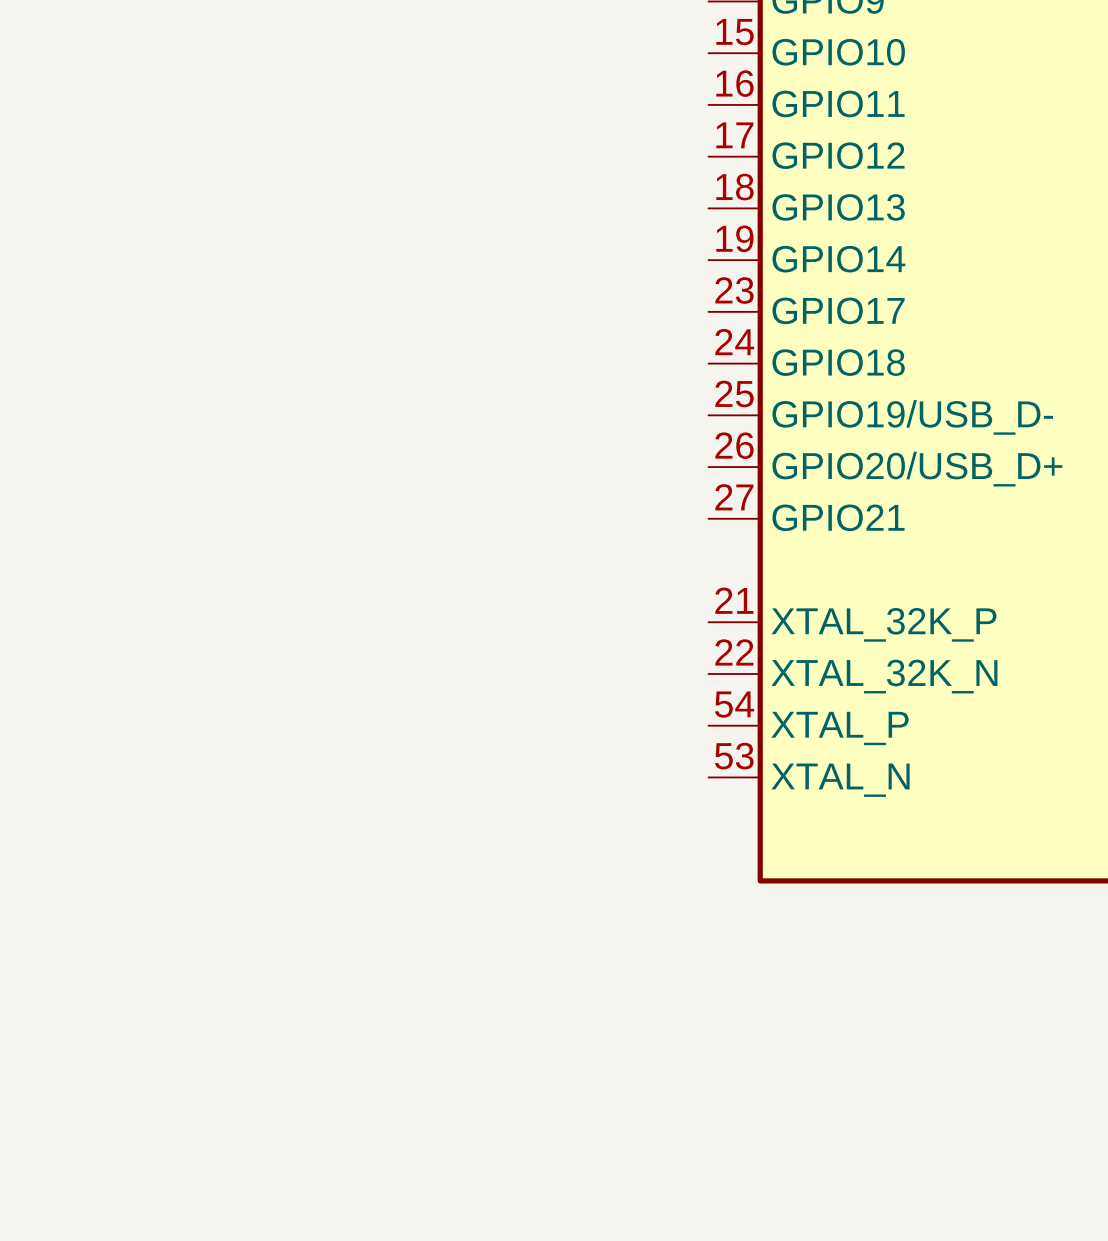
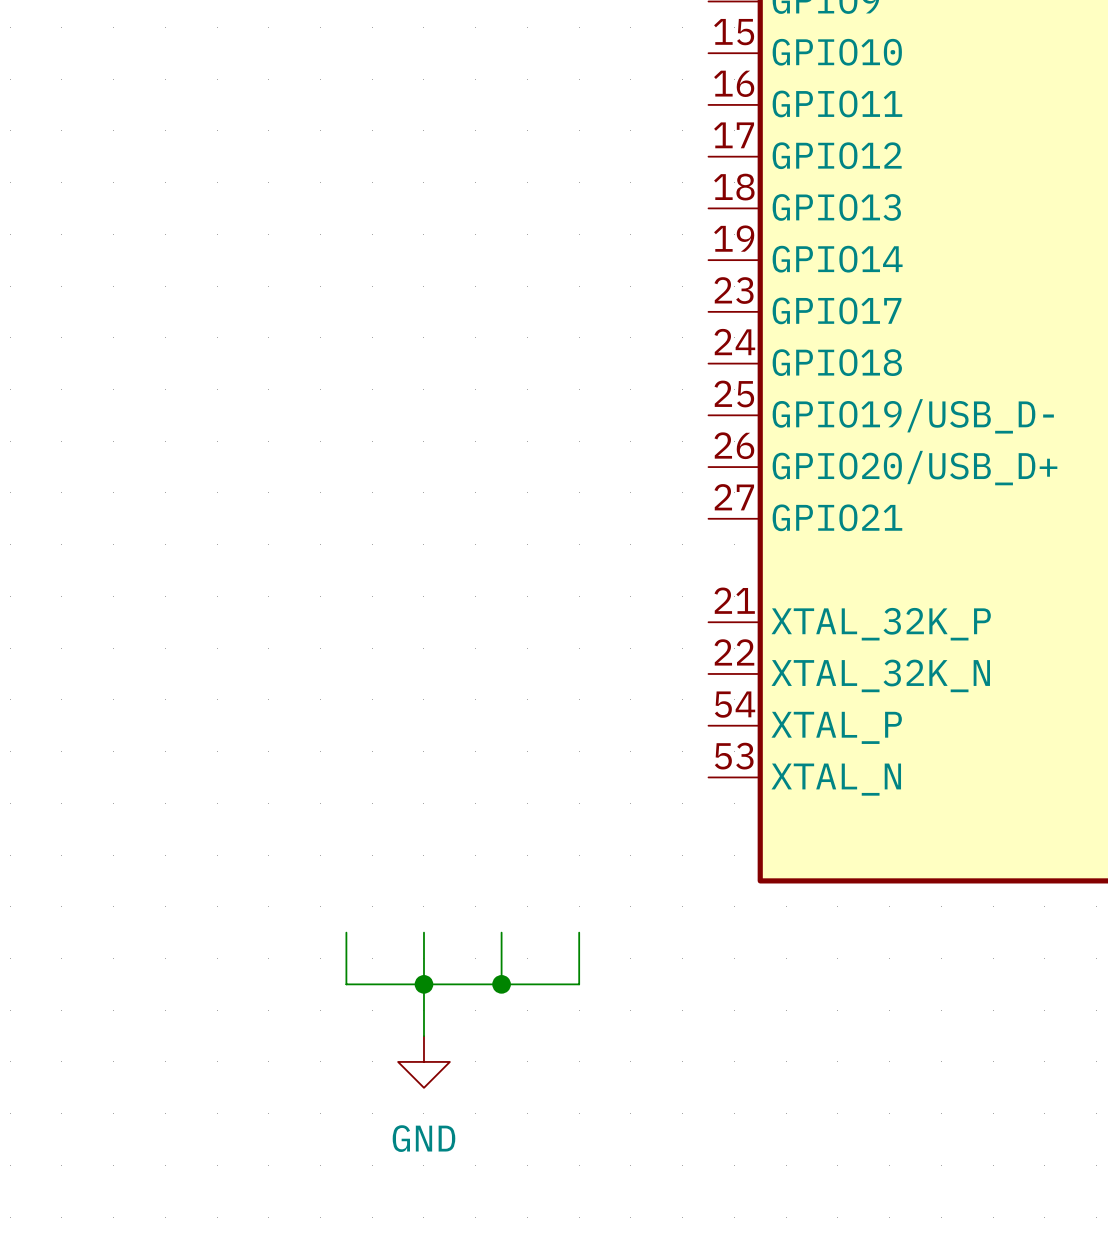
wire: none -> (346, 932) (346, 984) (579, 984) (579, 932)
wire: none -> (423, 932) (423, 1036)
wire: none -> (501, 932) (501, 984)
junction: none -> (423, 984)
junction: none -> (501, 984)
power symbol: none -> GND (423, 1061)

